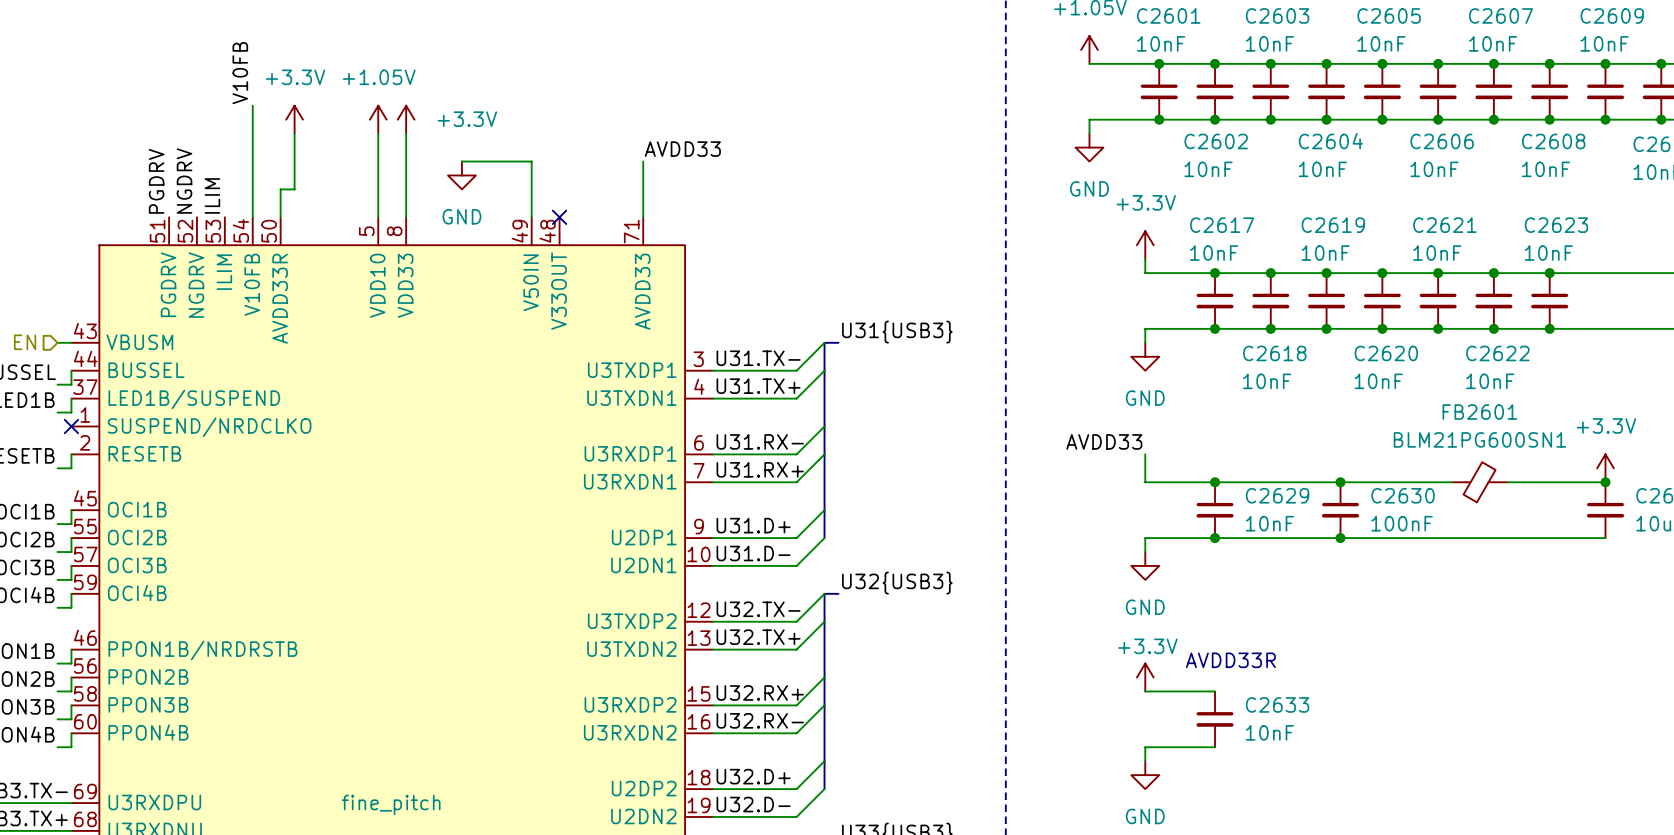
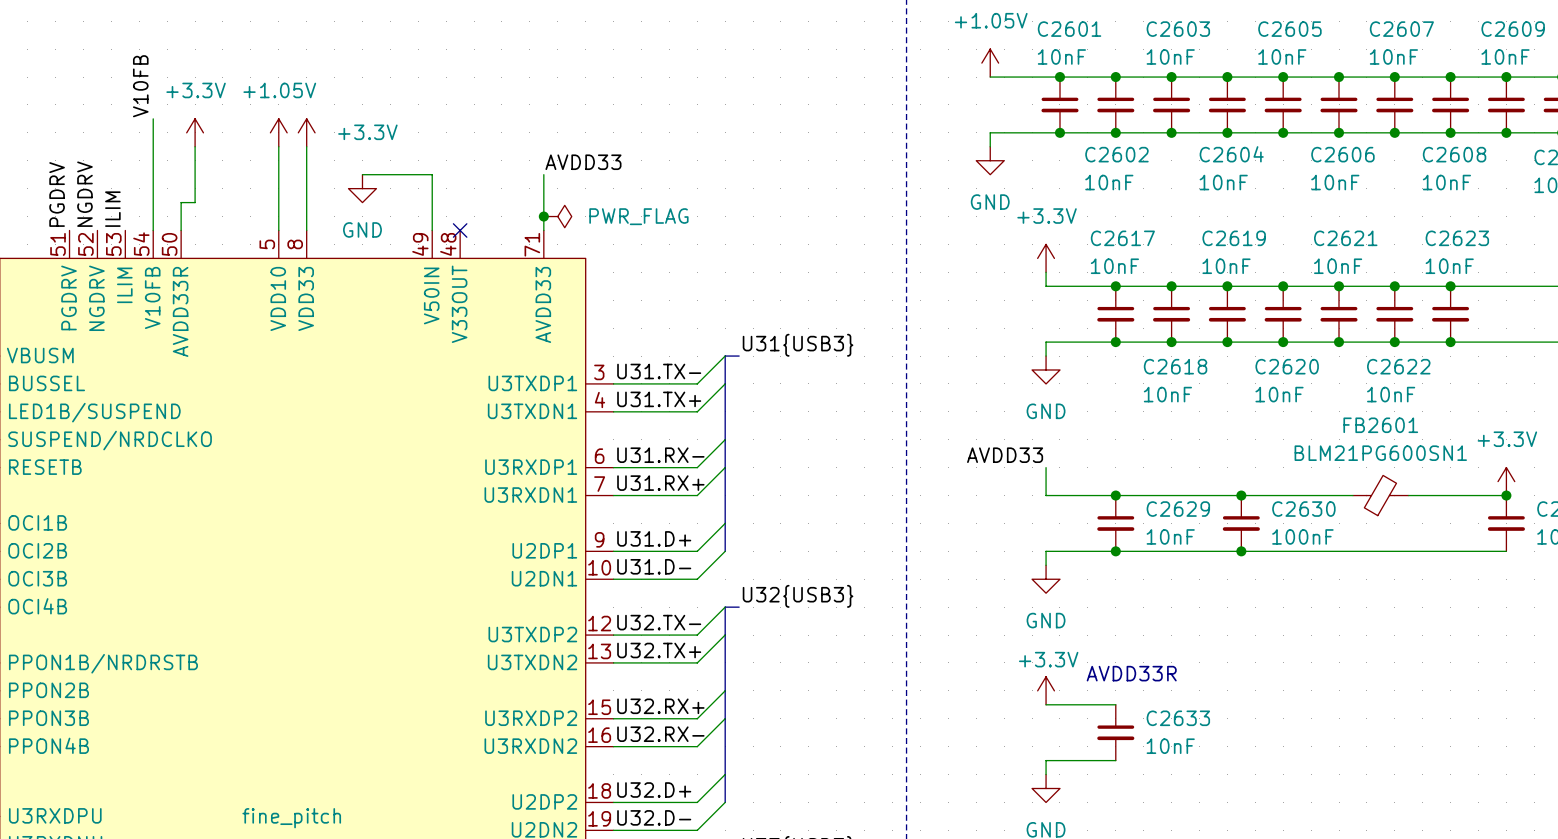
junction: none -> (543, 216)
power symbol: none -> PWR_FLAG (557, 216)

